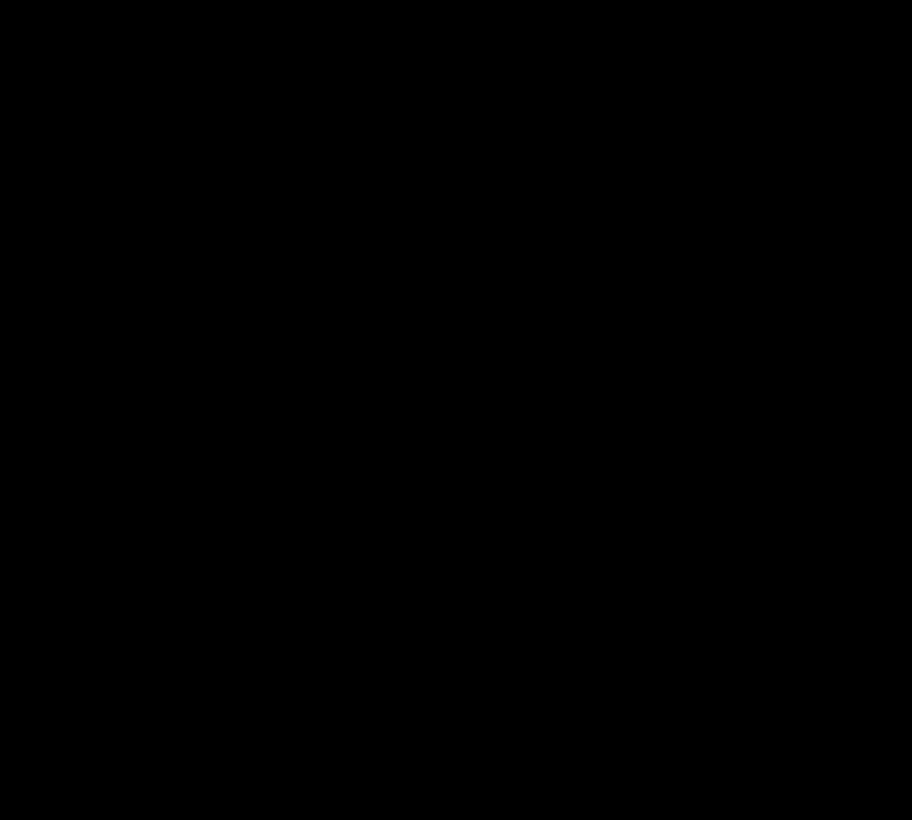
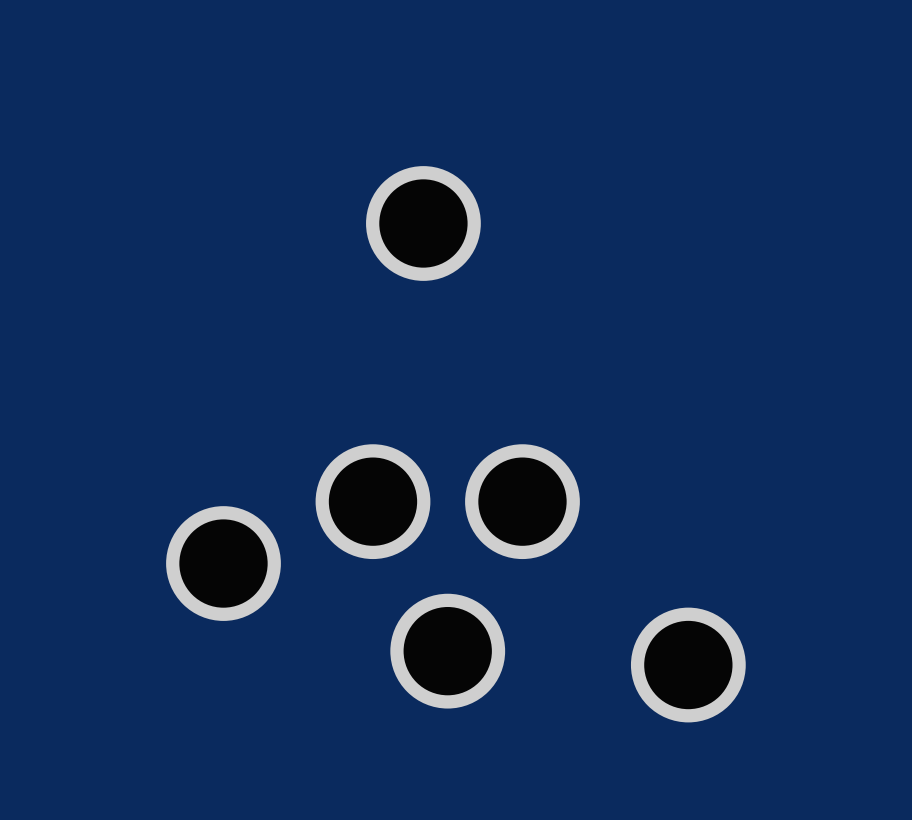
part: none -> (423, 223)
part: none -> (372, 501)
part: none -> (522, 501)
part: none -> (223, 563)
part: none -> (447, 651)
part: none -> (688, 665)

